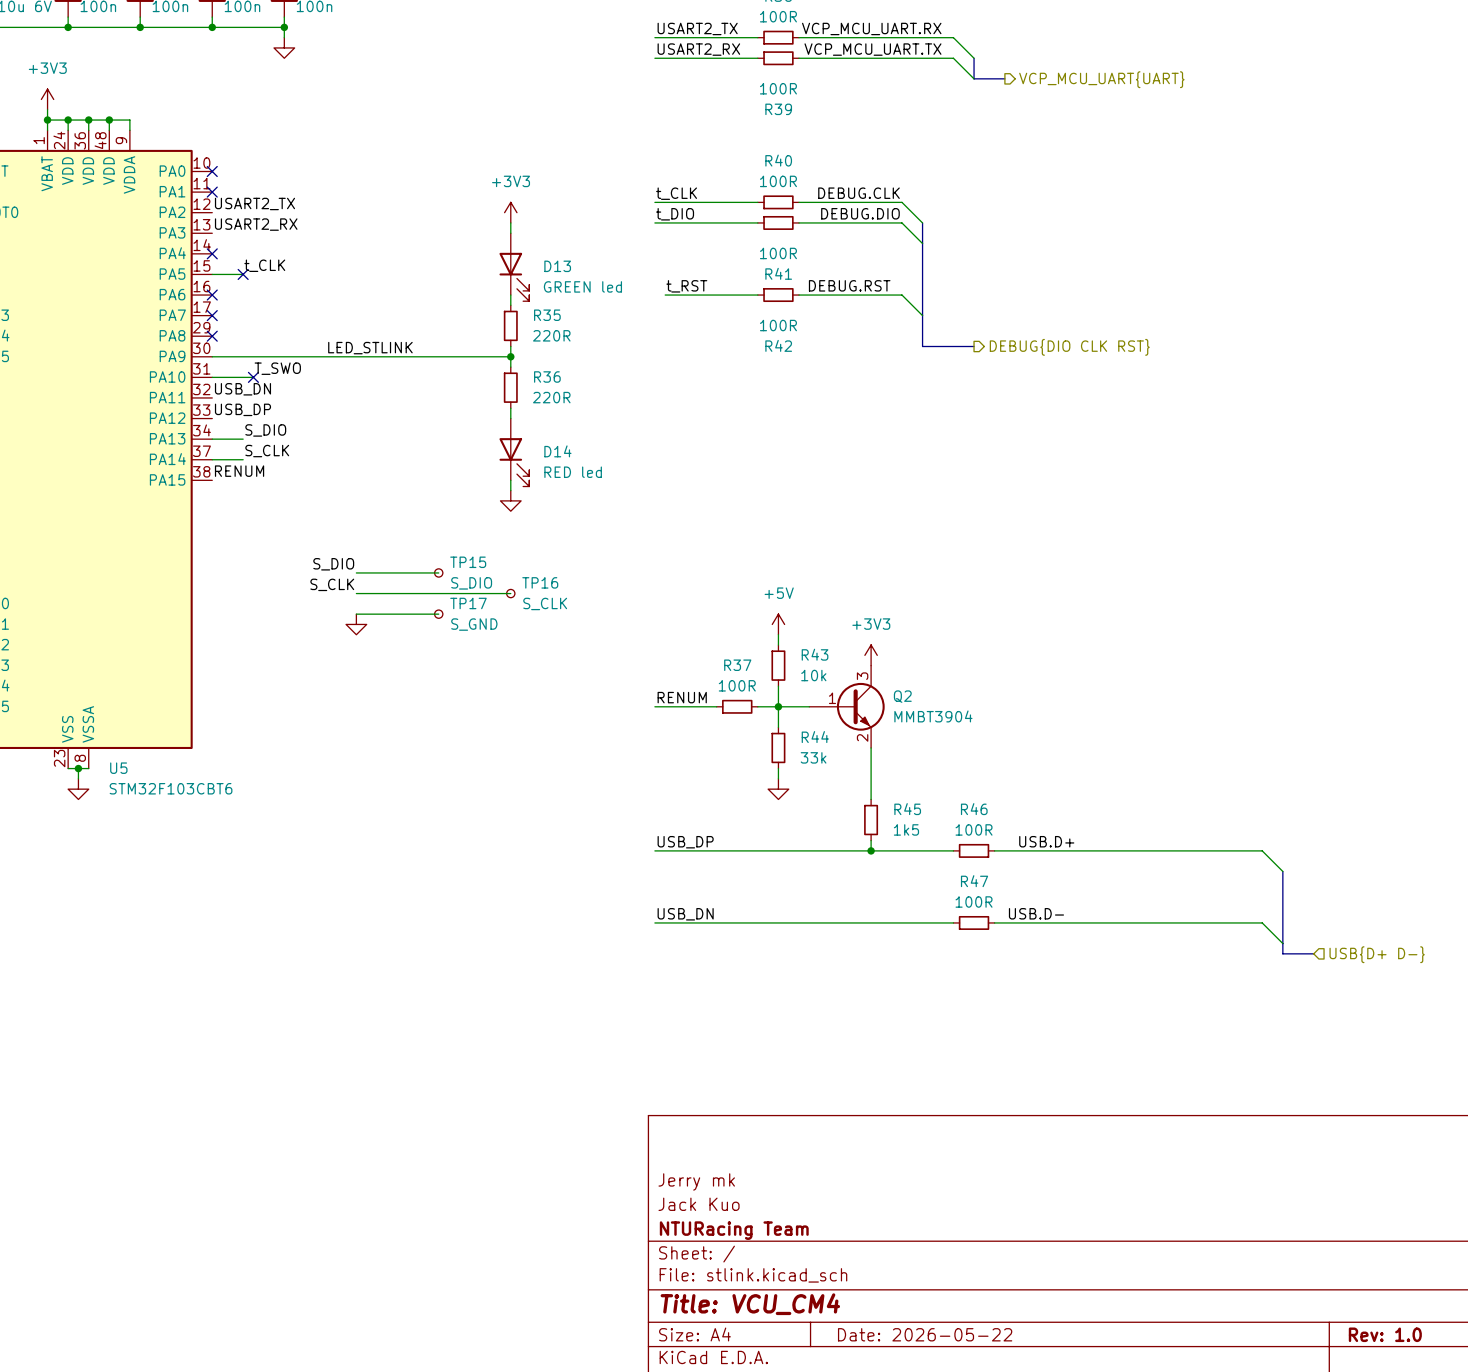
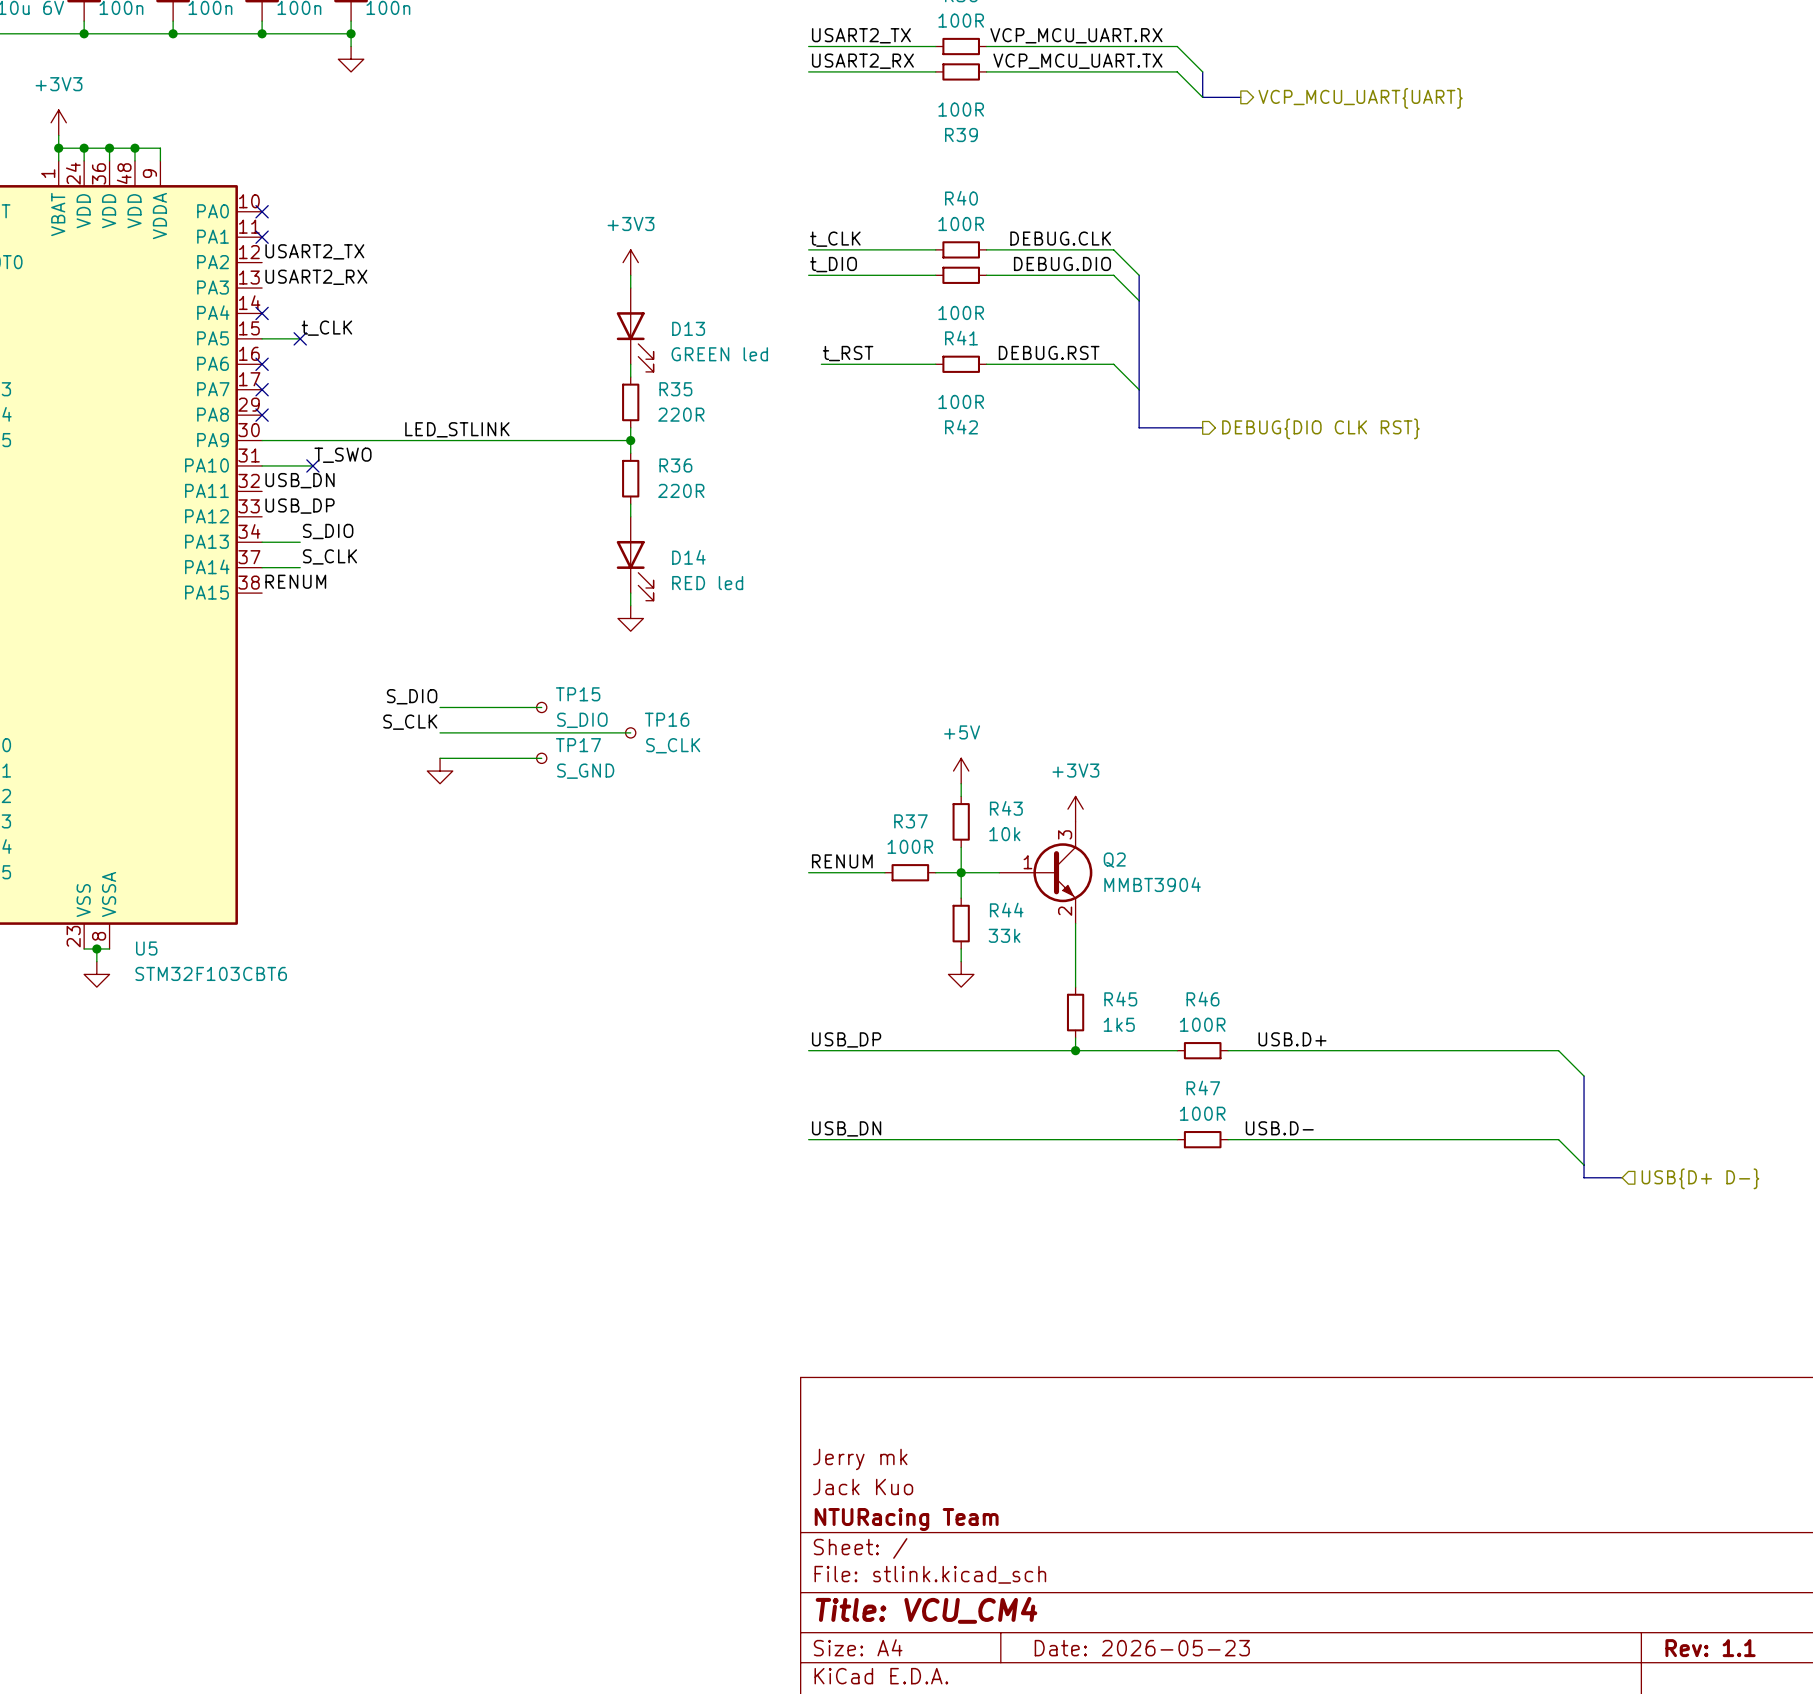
title block: Date: 2026-05-22 (925, 1334) -> Date: 2026-05-23 (1142, 1648)
title block: Rev: 1.0 (1385, 1334) -> Rev: 1.1 (1710, 1648)

